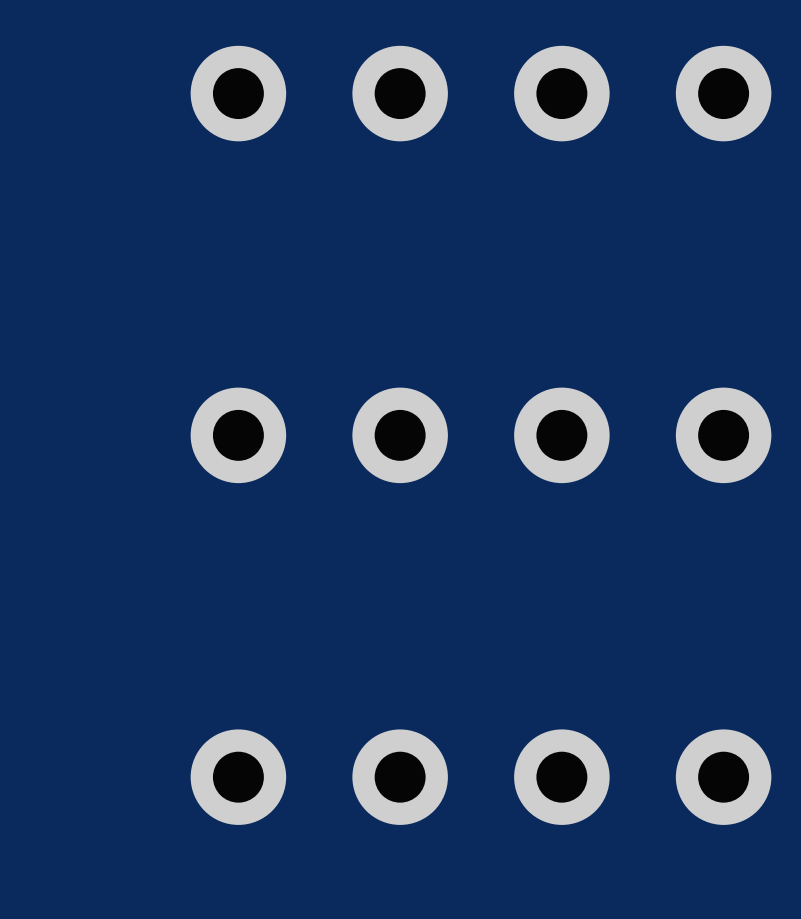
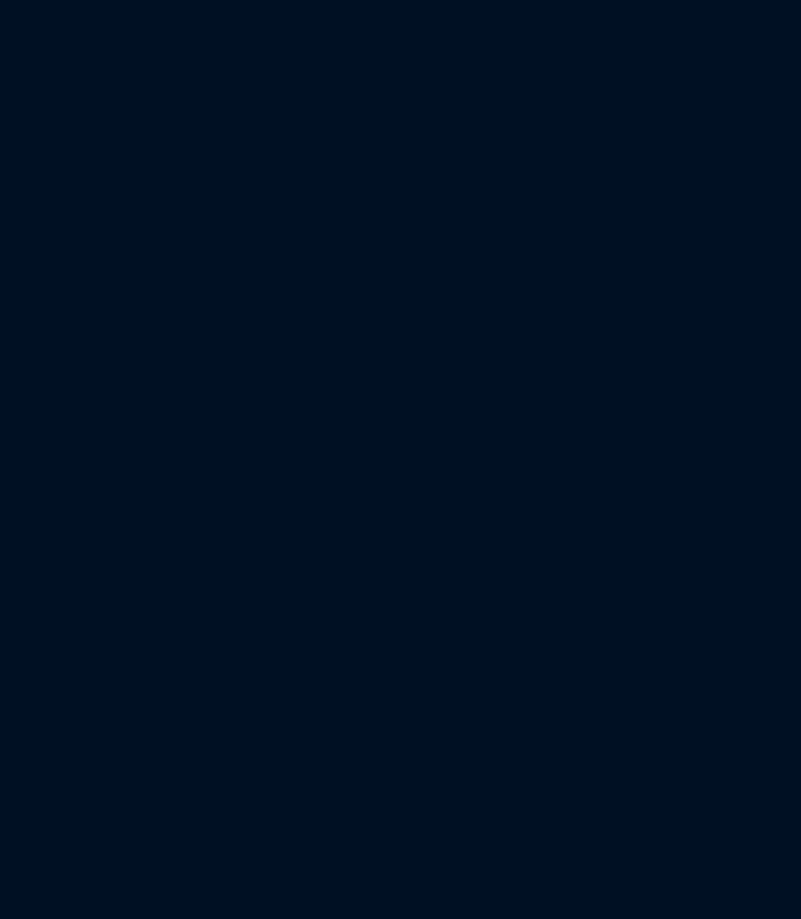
part: (481, 93) -> none
part: (481, 435) -> none
part: (481, 777) -> none

